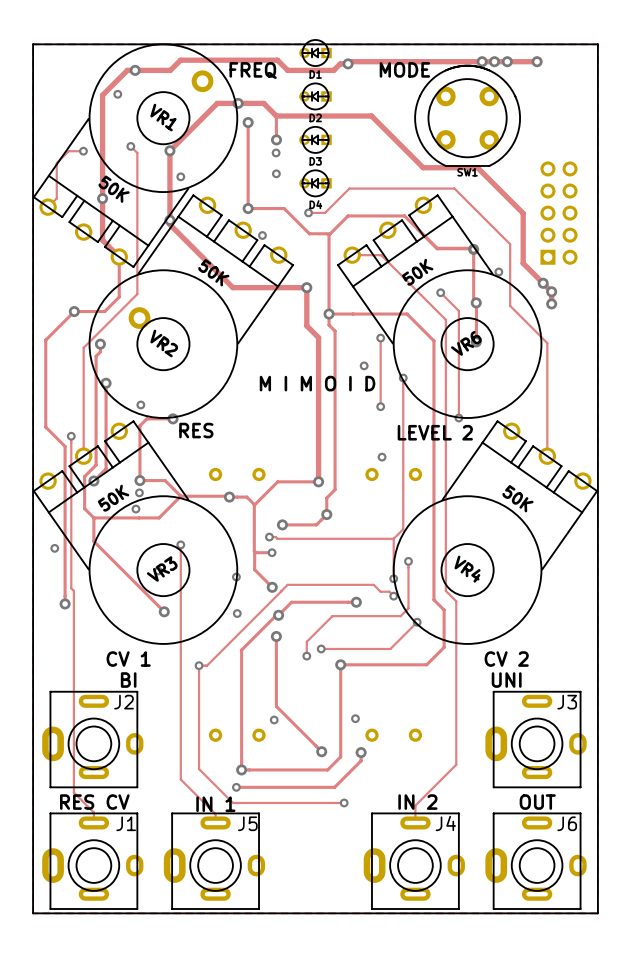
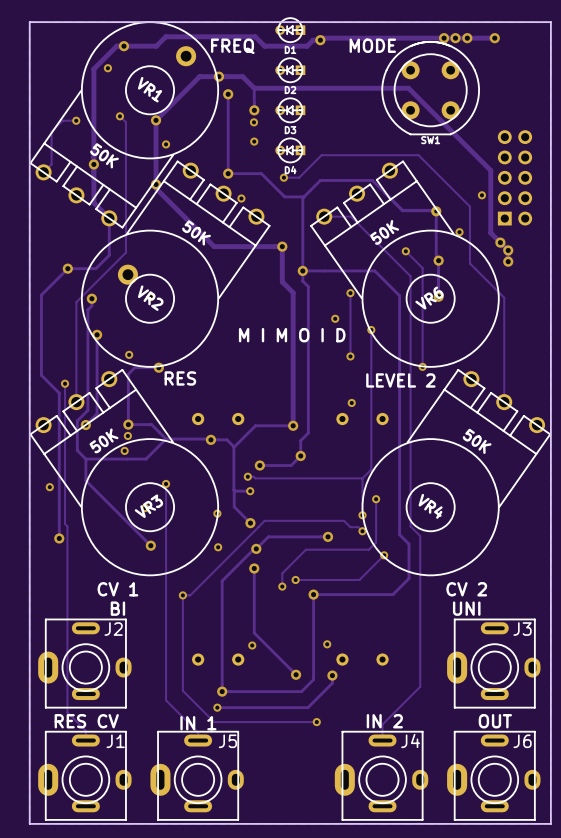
track: (371, 116) (423, 167) (477, 167) (523, 213) (523, 263) (532, 272) -> (342, 88) (408, 88) (490, 170) (490, 232)
via: none -> (481, 195)

